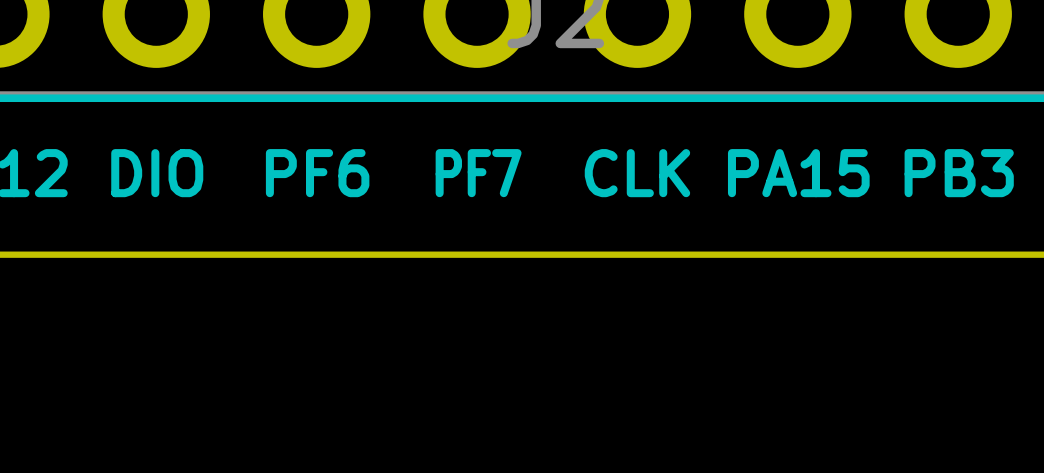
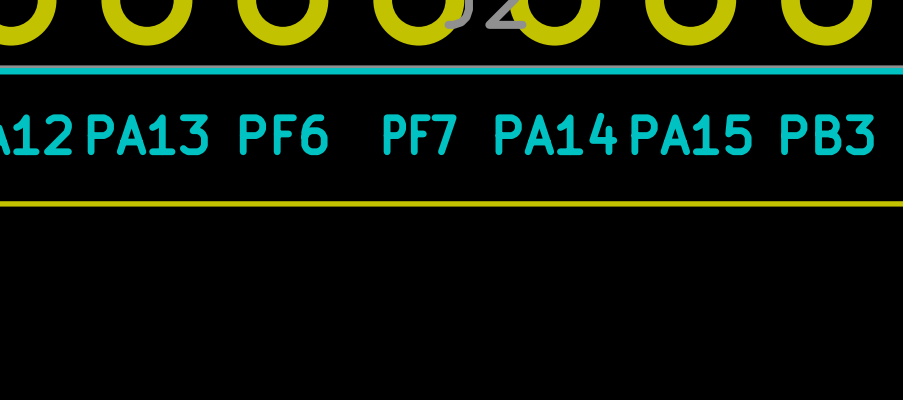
text: DIO (157, 173) -> PA13 (147, 134)
text: CLK (637, 173) -> PA14 (556, 133)

